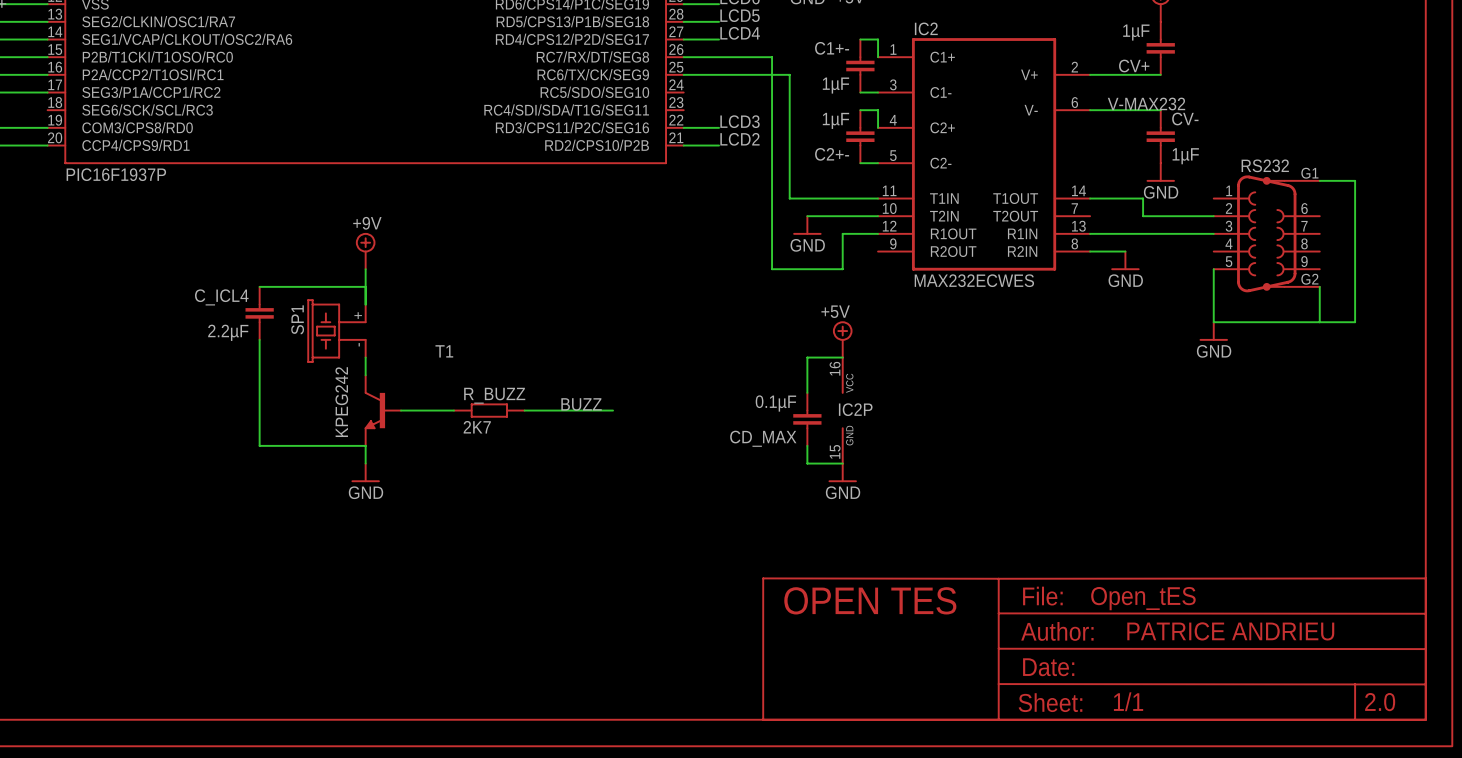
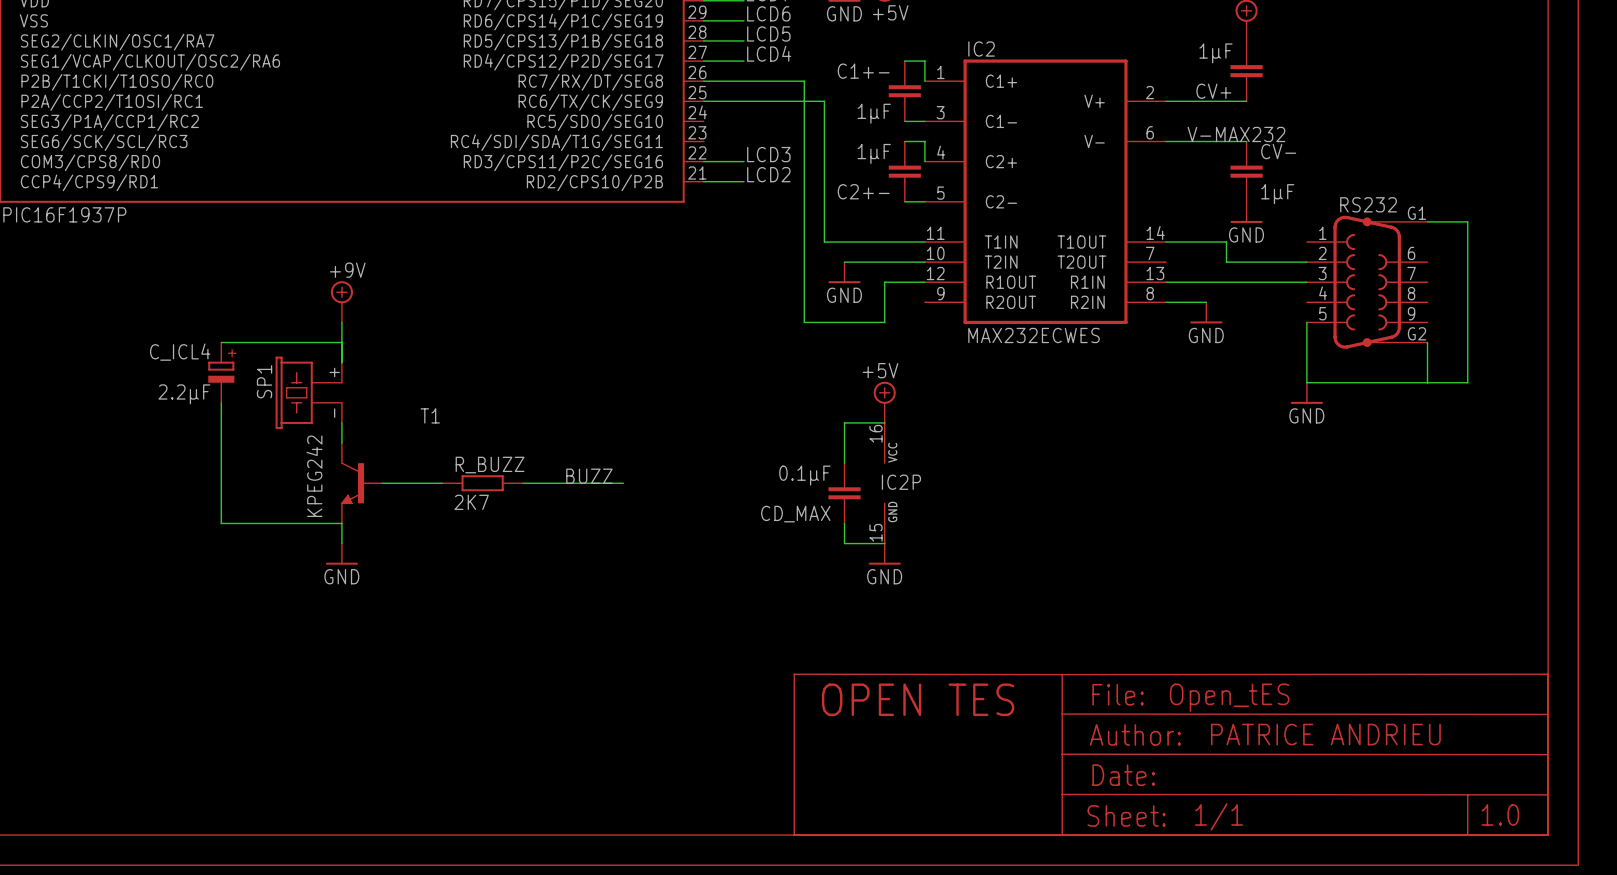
C_ICL4 symbol: [245, 286, 274, 340] -> [208, 342, 235, 403]
part text: 2.0 (1380, 702) -> 1.0 (1500, 814)

